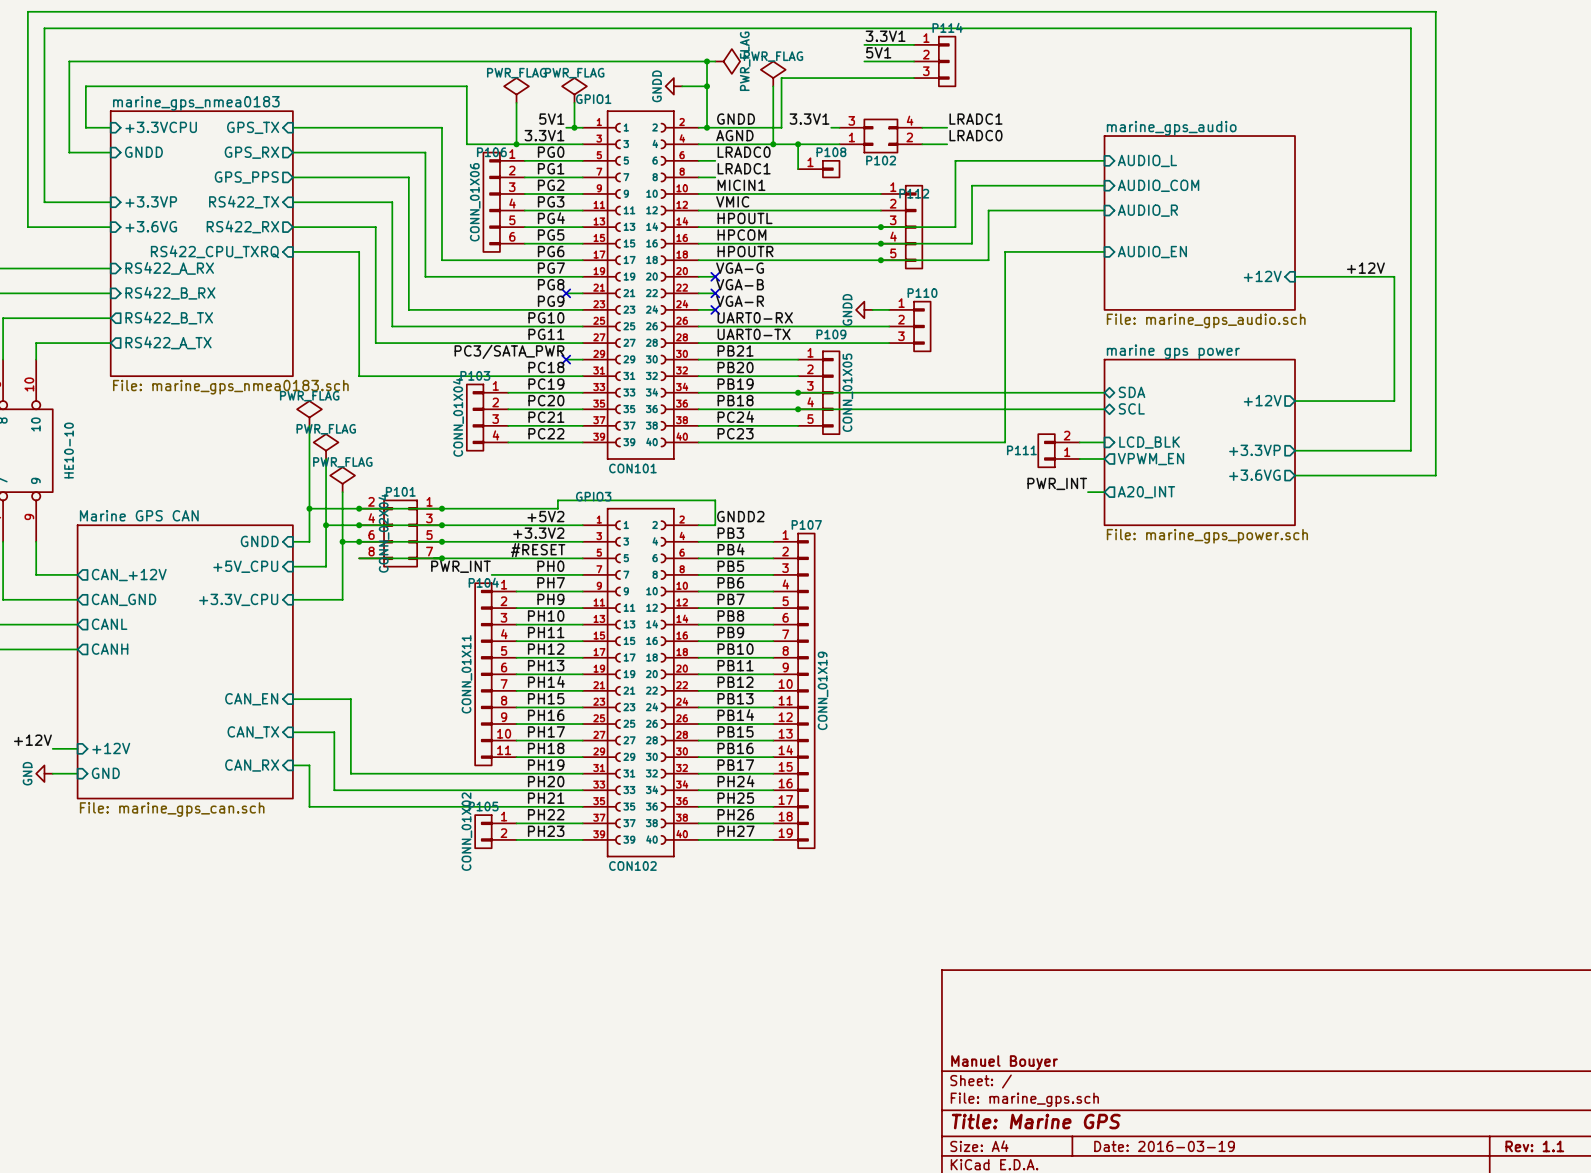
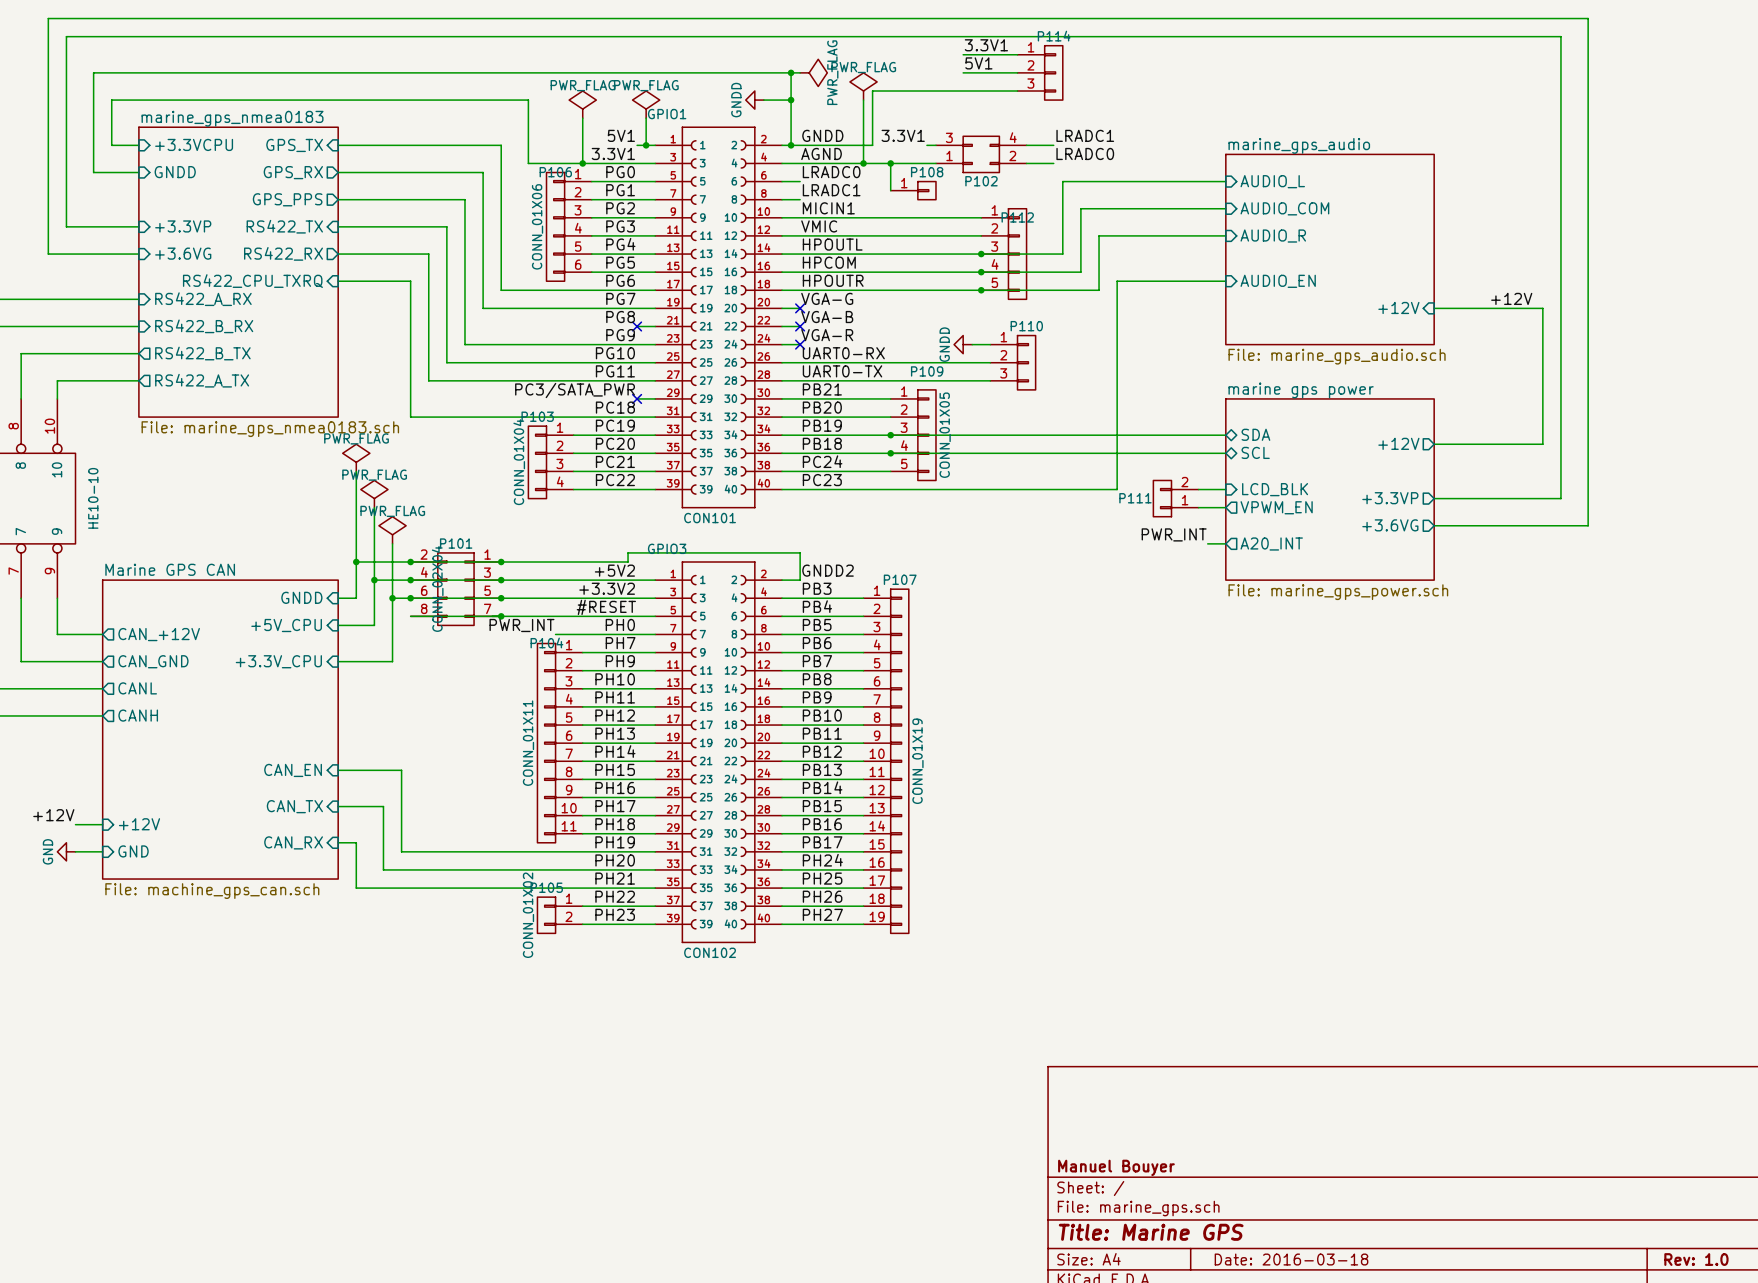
sheet Marine GPS CAN value: File: marine_gps_can.sch (172, 809) -> File: machine_gps_can.sch (212, 891)
title block: Date: 2016-03-19 (1164, 1146) -> Date: 2016-03-18 (1291, 1259)
title block: Rev: 1.1 (1534, 1146) -> Rev: 1.0 (1696, 1259)

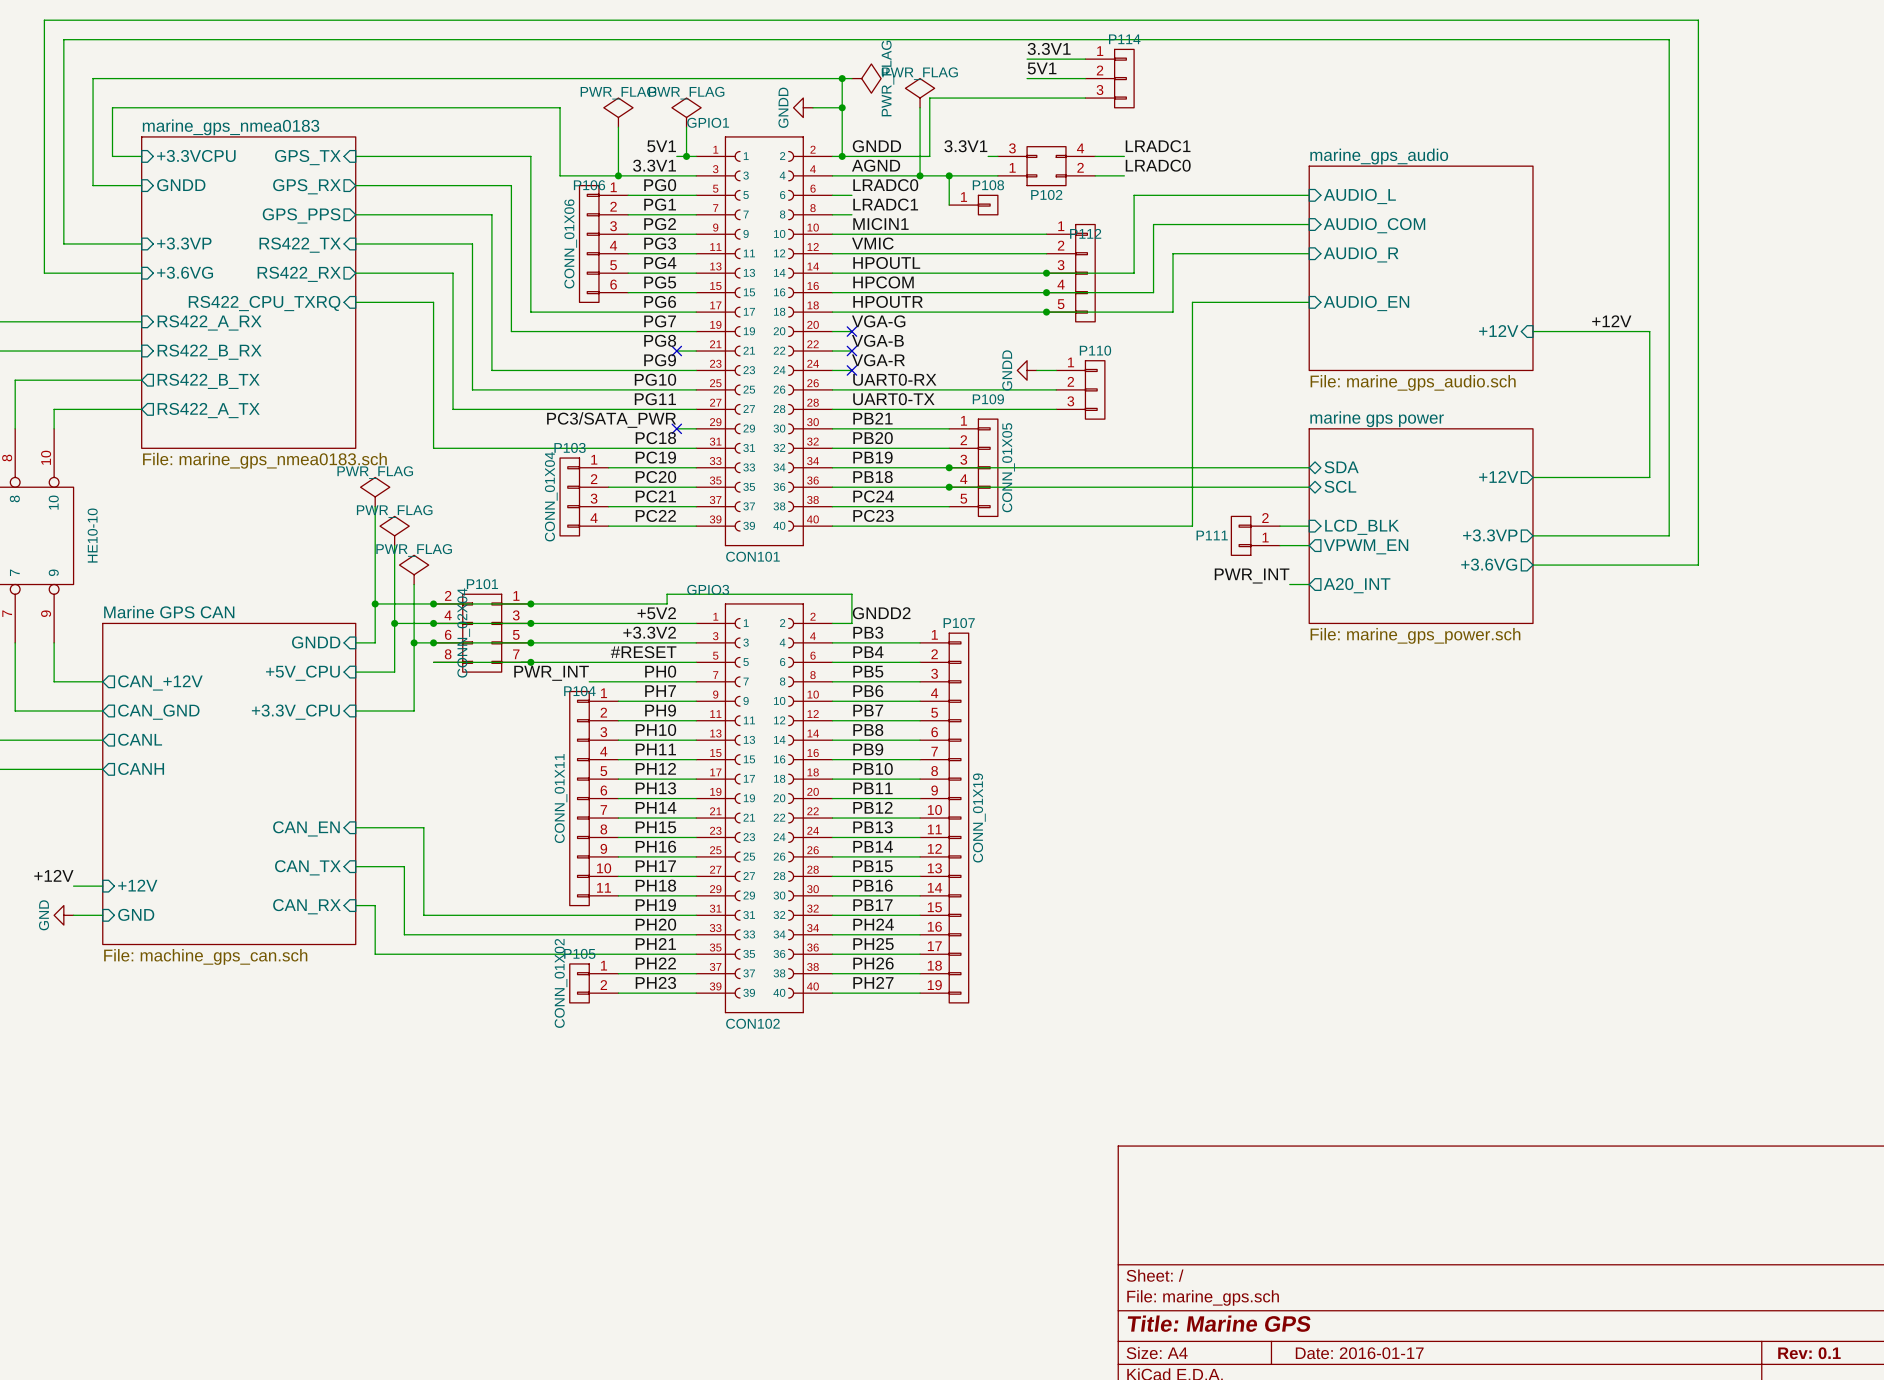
title block: Manuel Bouyer (1116, 1167) -> none
title block: Date: 2016-03-18 (1291, 1259) -> Date: 2016-01-17 (1359, 1353)
title block: Rev: 1.0 (1696, 1259) -> Rev: 0.1 (1809, 1353)

